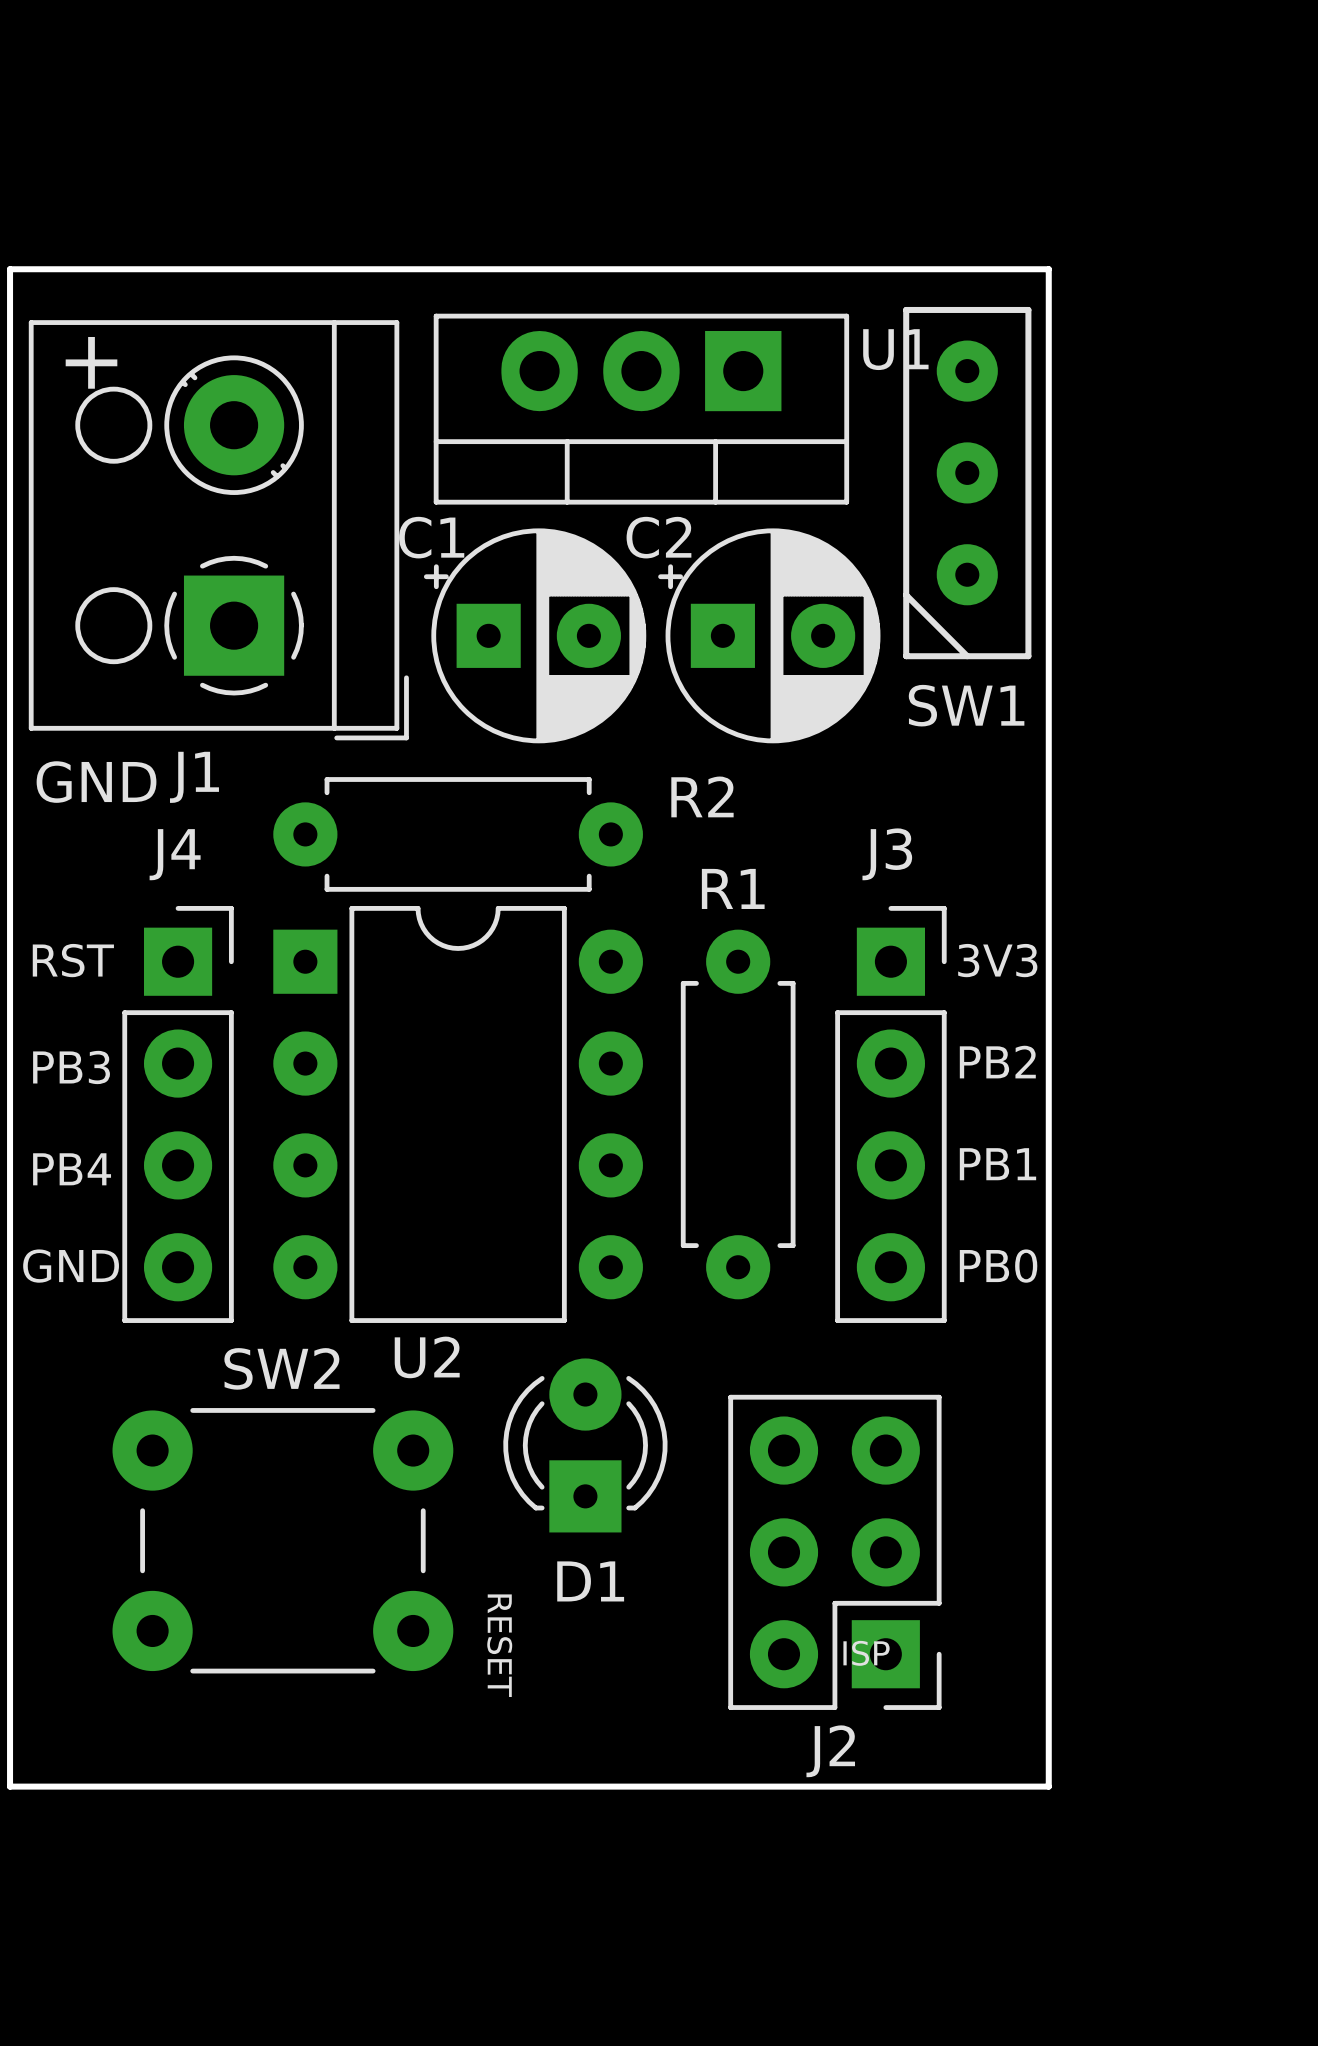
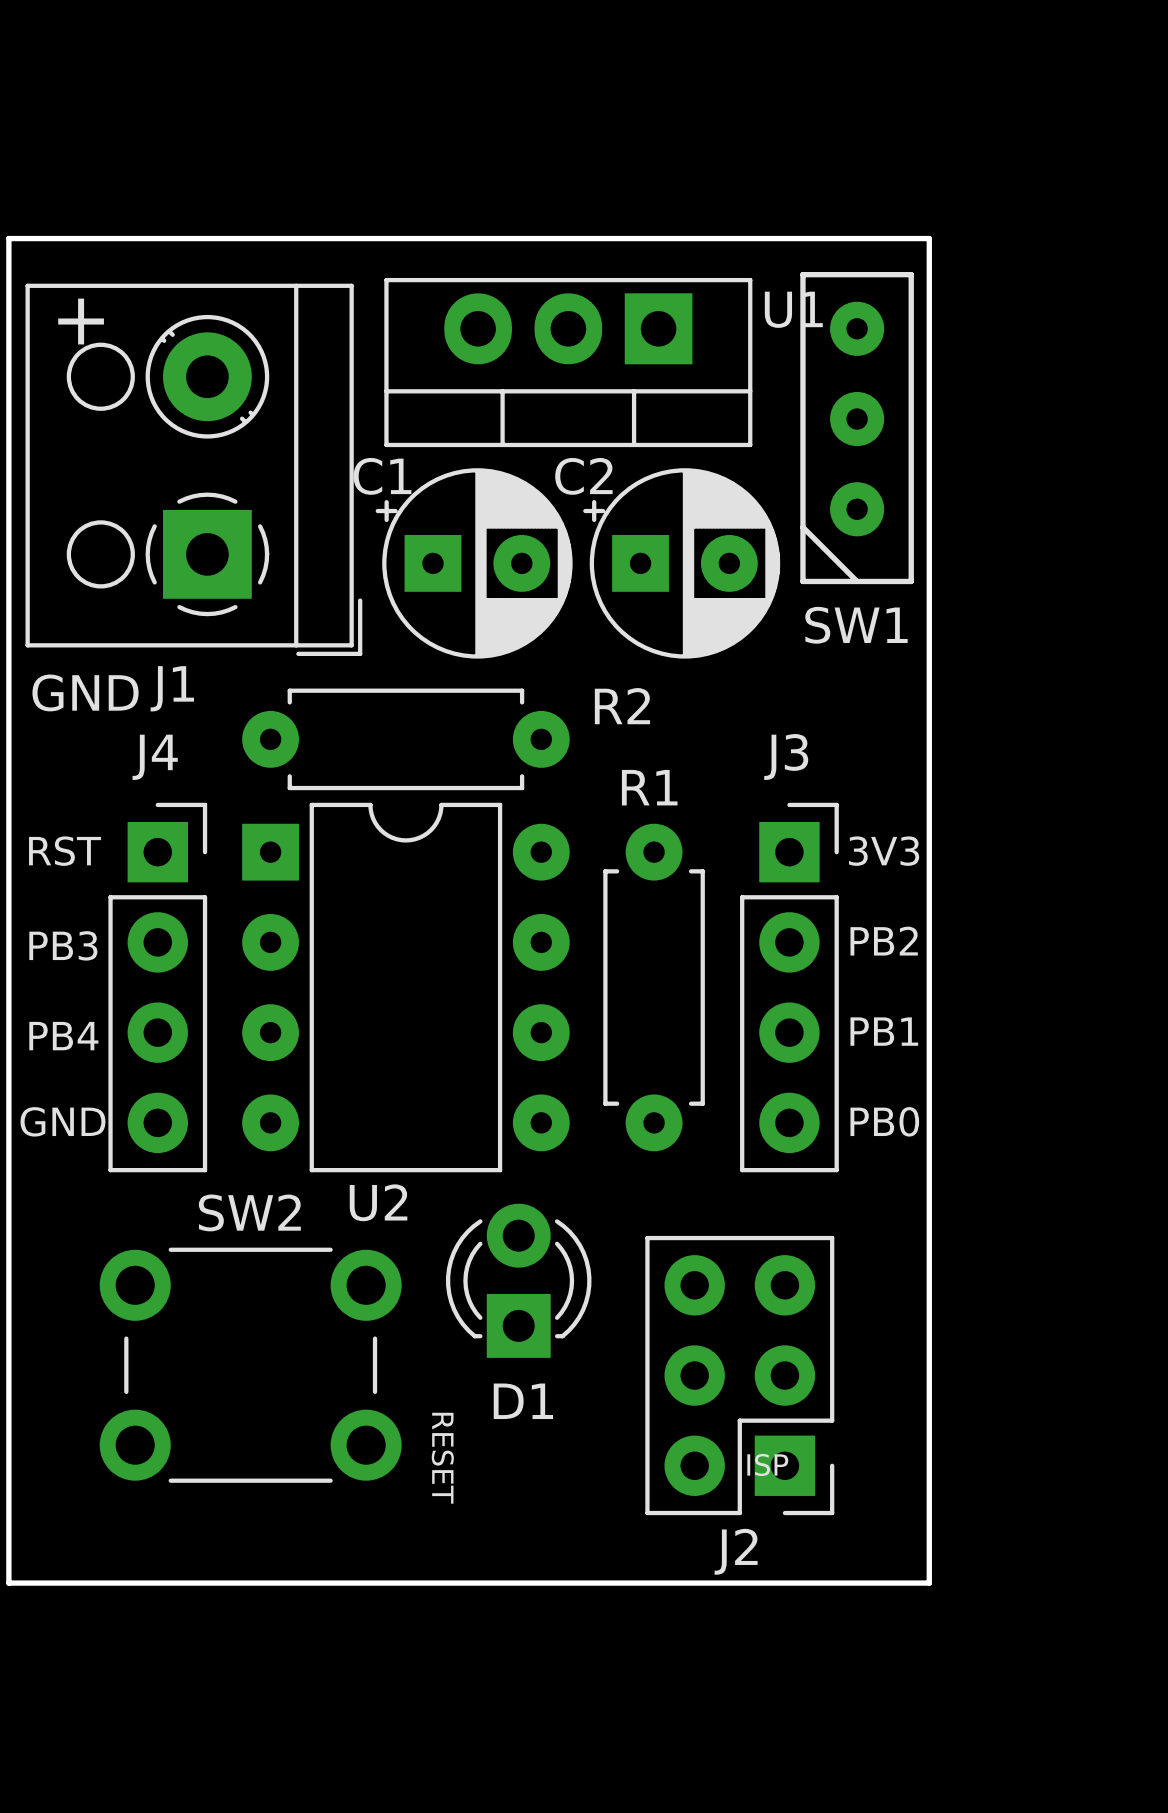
D1 footprint: [503, 1358, 668, 1533] -> [445, 1203, 592, 1358]
SW2 footprint: [112, 1408, 454, 1674] -> [99, 1247, 402, 1483]

